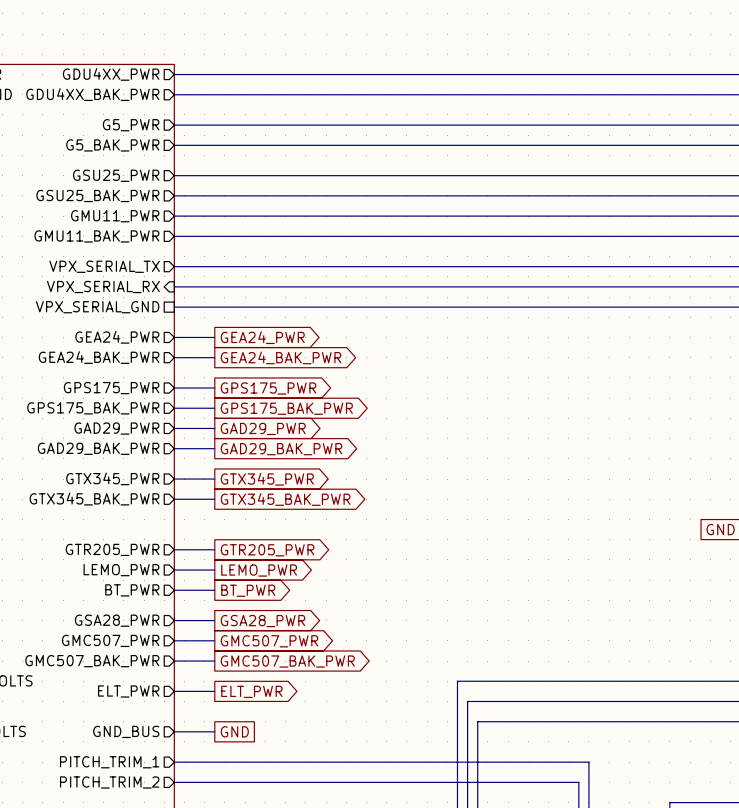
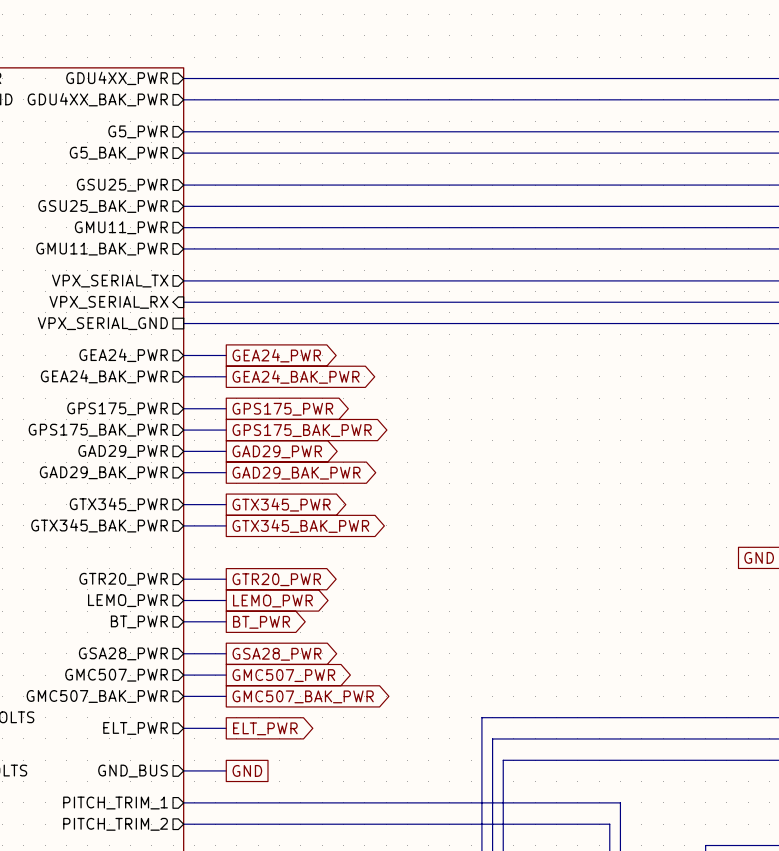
sheet pin: GTR205_PWR (112, 549) -> GTR20_PWR (123, 579)
global label: GTR205_PWR (267, 550) -> GTR20_PWR (276, 579)

